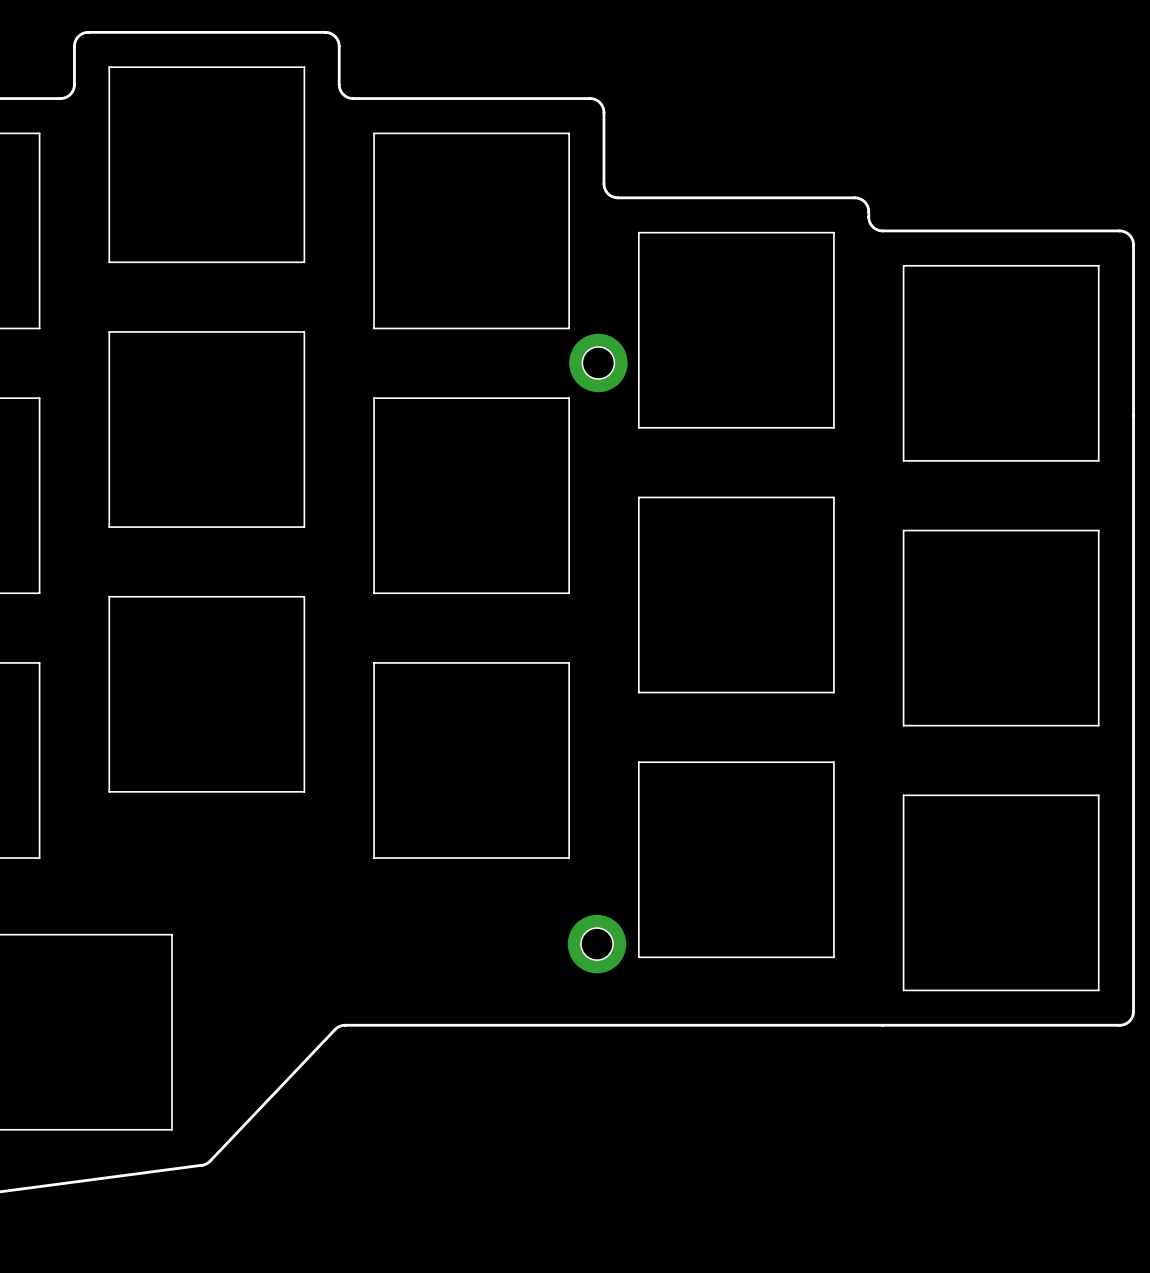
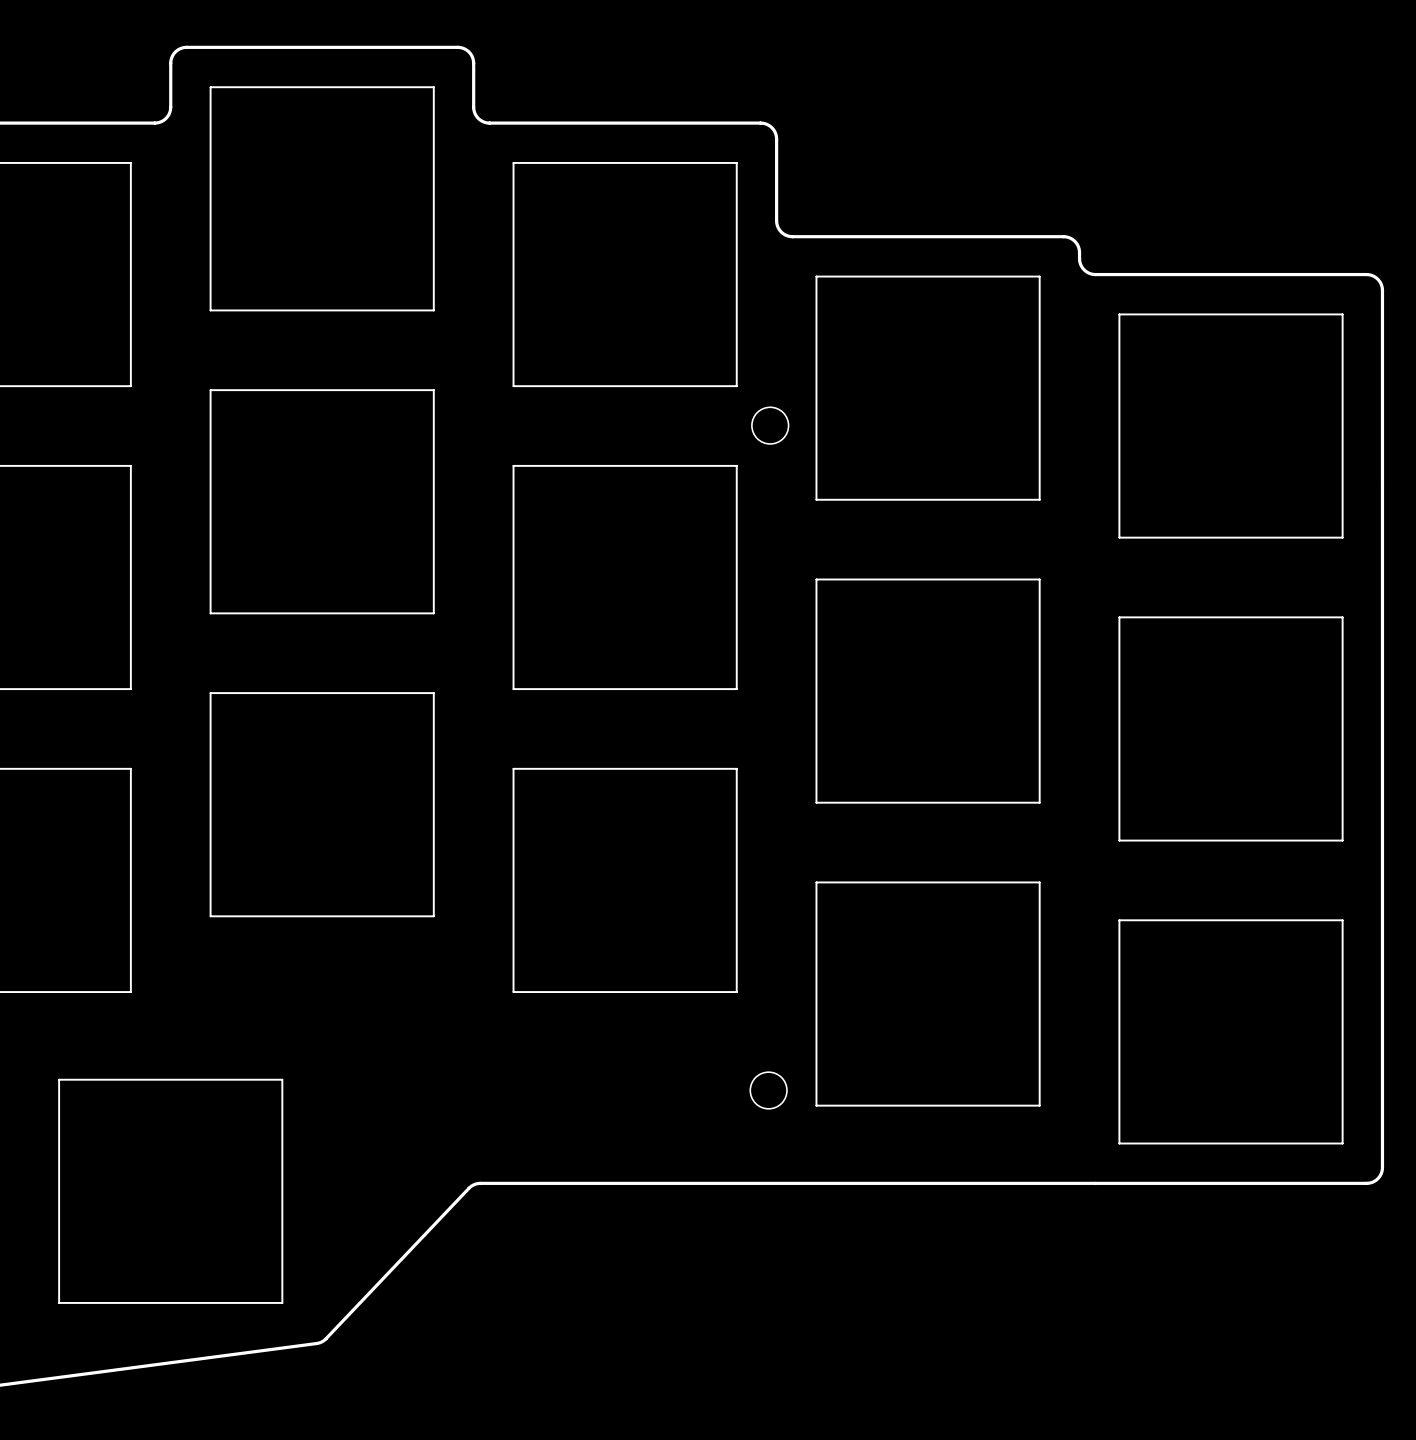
drawing: none -> [751, 406, 790, 445]
part: (598, 362) -> none
drawing: none -> [749, 1071, 788, 1110]
part: (597, 944) -> none

